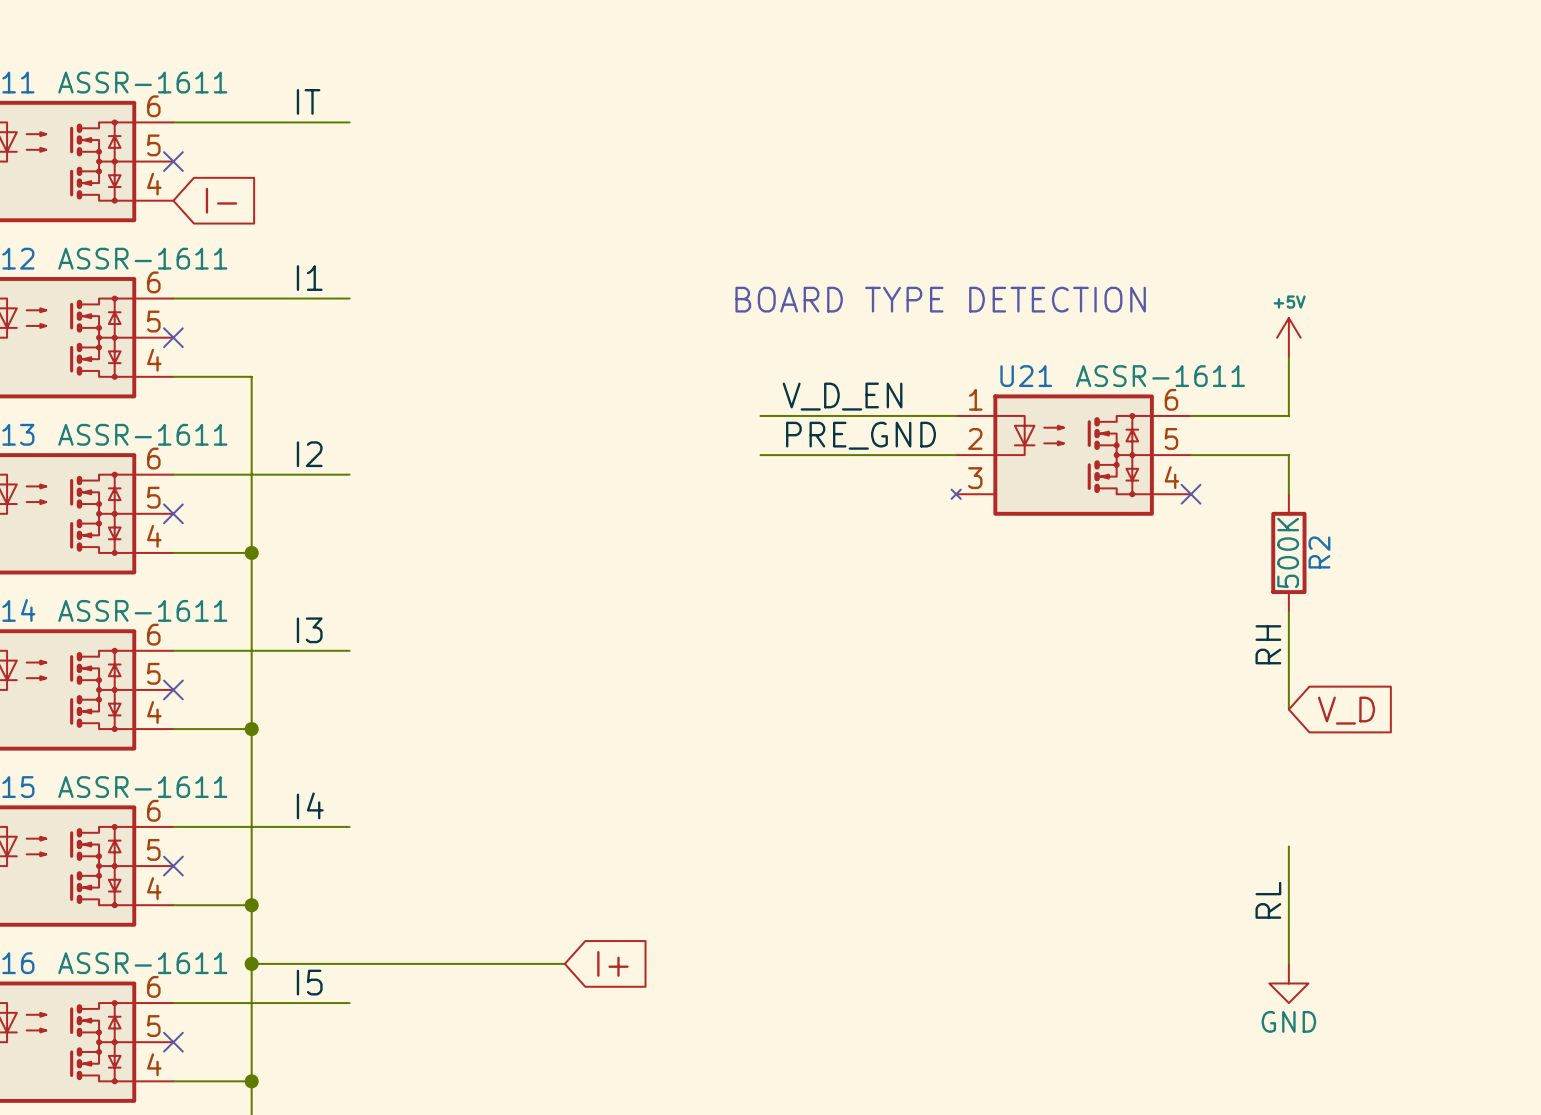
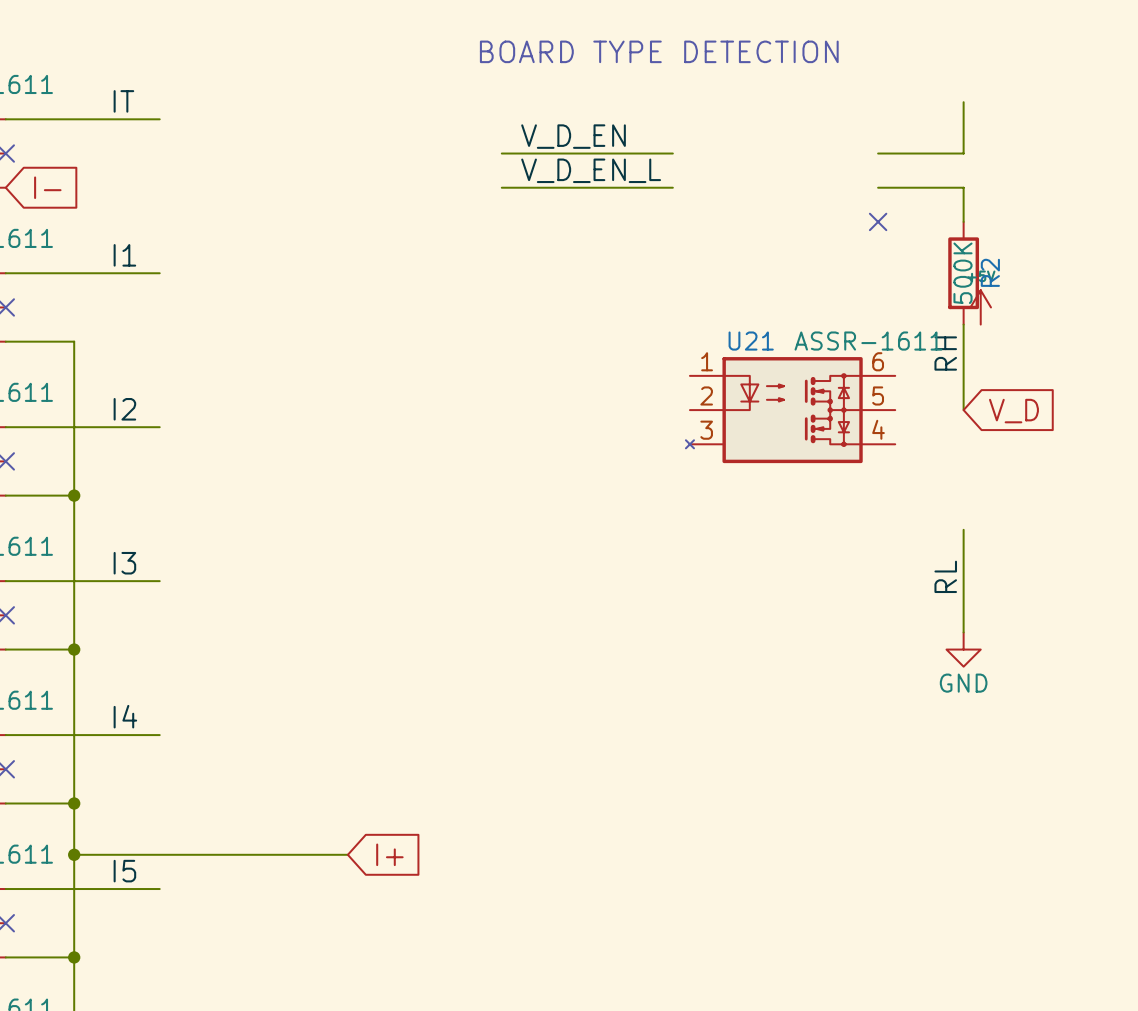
label: none -> V_D_EN_L (591, 170)
no-connect mark: none -> (878, 221)
text position: BOARD TYPE DETECTION (940, 299) -> BOARD TYPE DETECTION (659, 51)
wire: (1288, 357) (1288, 415) (1191, 415) -> (963, 102) (963, 153) (878, 153)
label position: V_D_EN (842, 396) -> V_D_EN (573, 136)
wire: (760, 415) (956, 415) -> (501, 153) (672, 153)
label: PRE_GND (861, 435) -> none
wire: (760, 455) (956, 455) -> (501, 187) (672, 187)
wire: (1191, 455) (1288, 455) (1288, 494) -> (878, 187) (963, 187) (963, 221)
no-connect mark: (1191, 494) -> none
R2 position: (1288, 552) -> (963, 273)
wire: (1288, 611) (1288, 709) -> (963, 324) (963, 410)
label position: RH (1268, 644) -> RH (945, 353)
label: none -> RL (945, 576)
global label position: V_D (1346, 710) -> V_D (1013, 411)
wire: (1288, 846) (1288, 963) -> (963, 529) (963, 632)
label: RL (1268, 900) -> none
power symbol position: GND (1288, 983) -> GND (963, 649)

